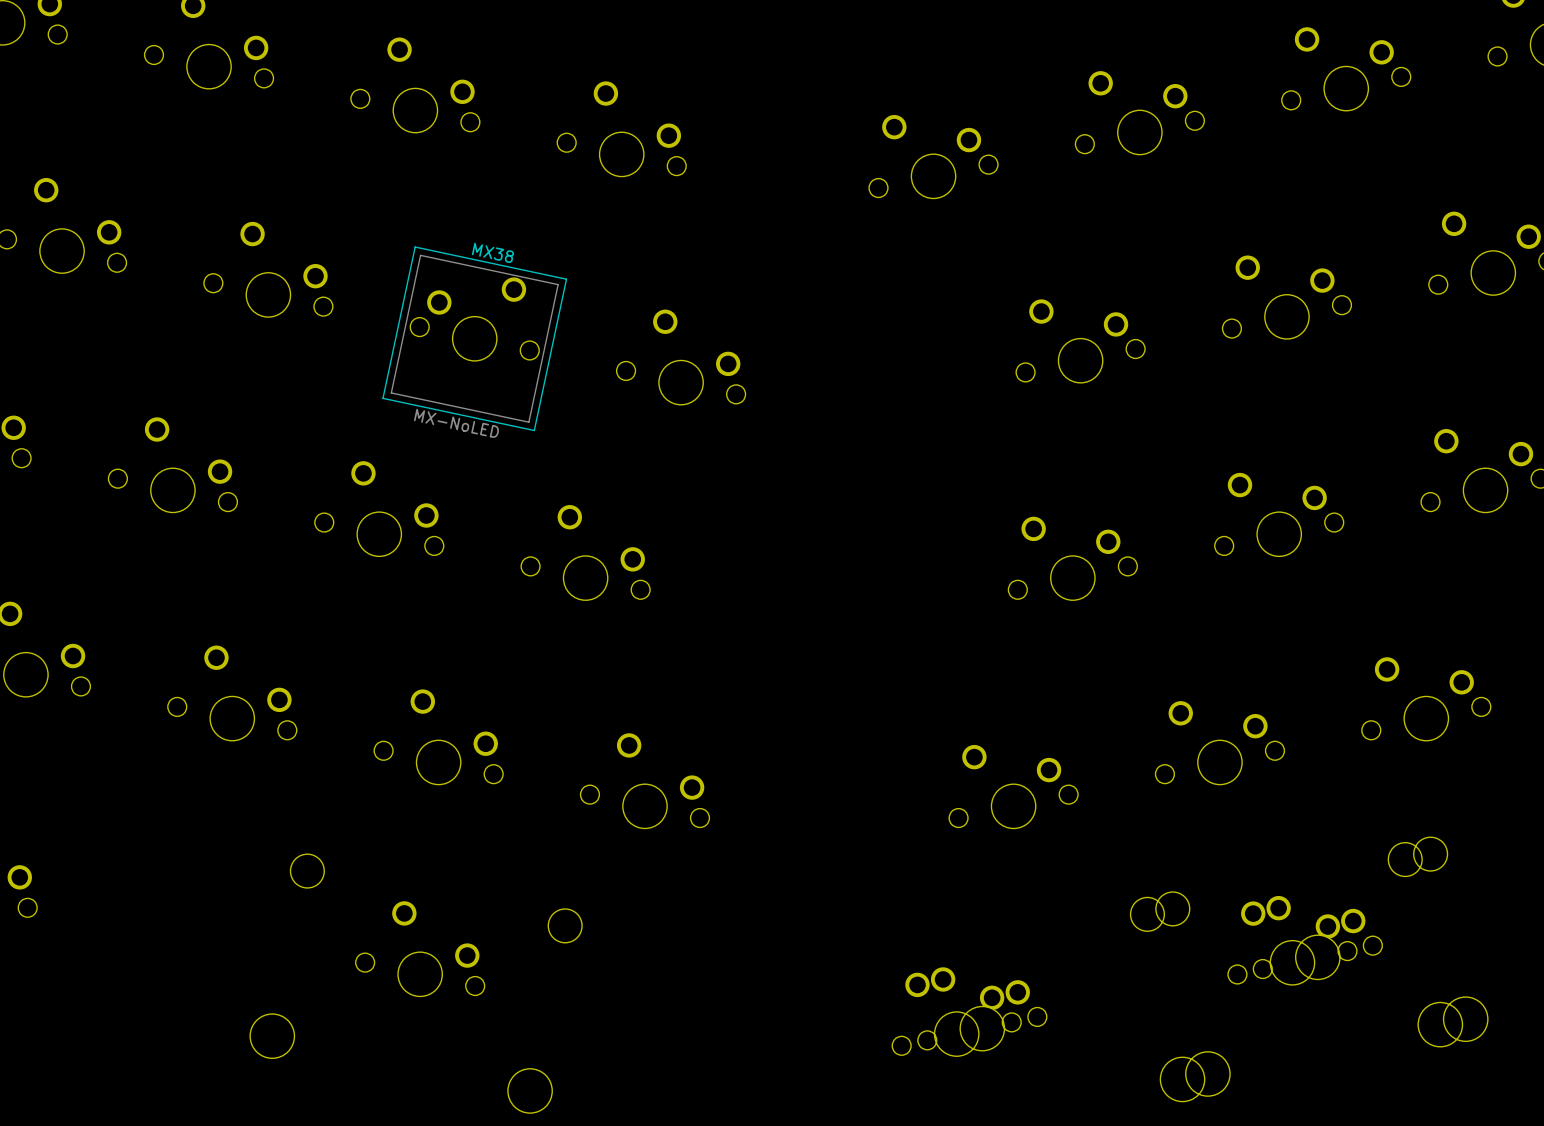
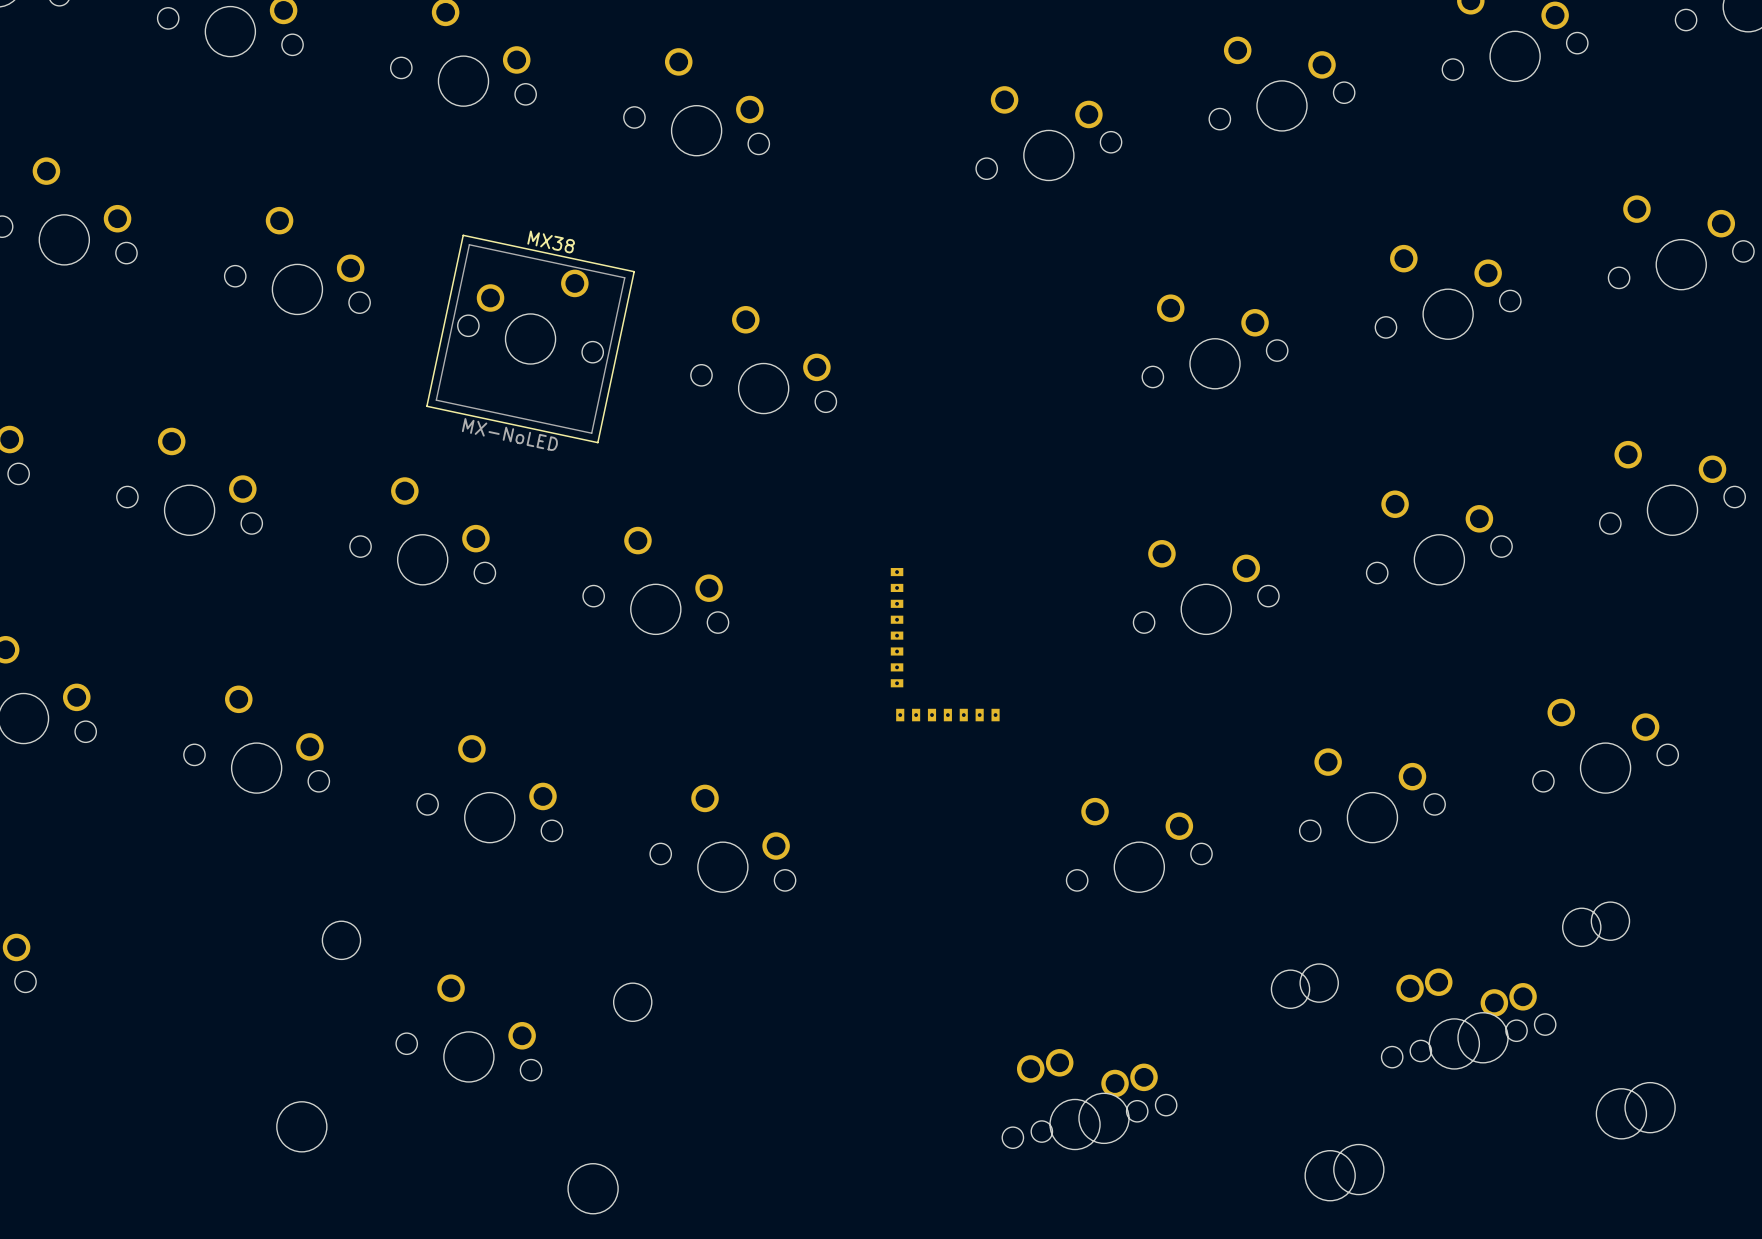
part: none -> (945, 644)

